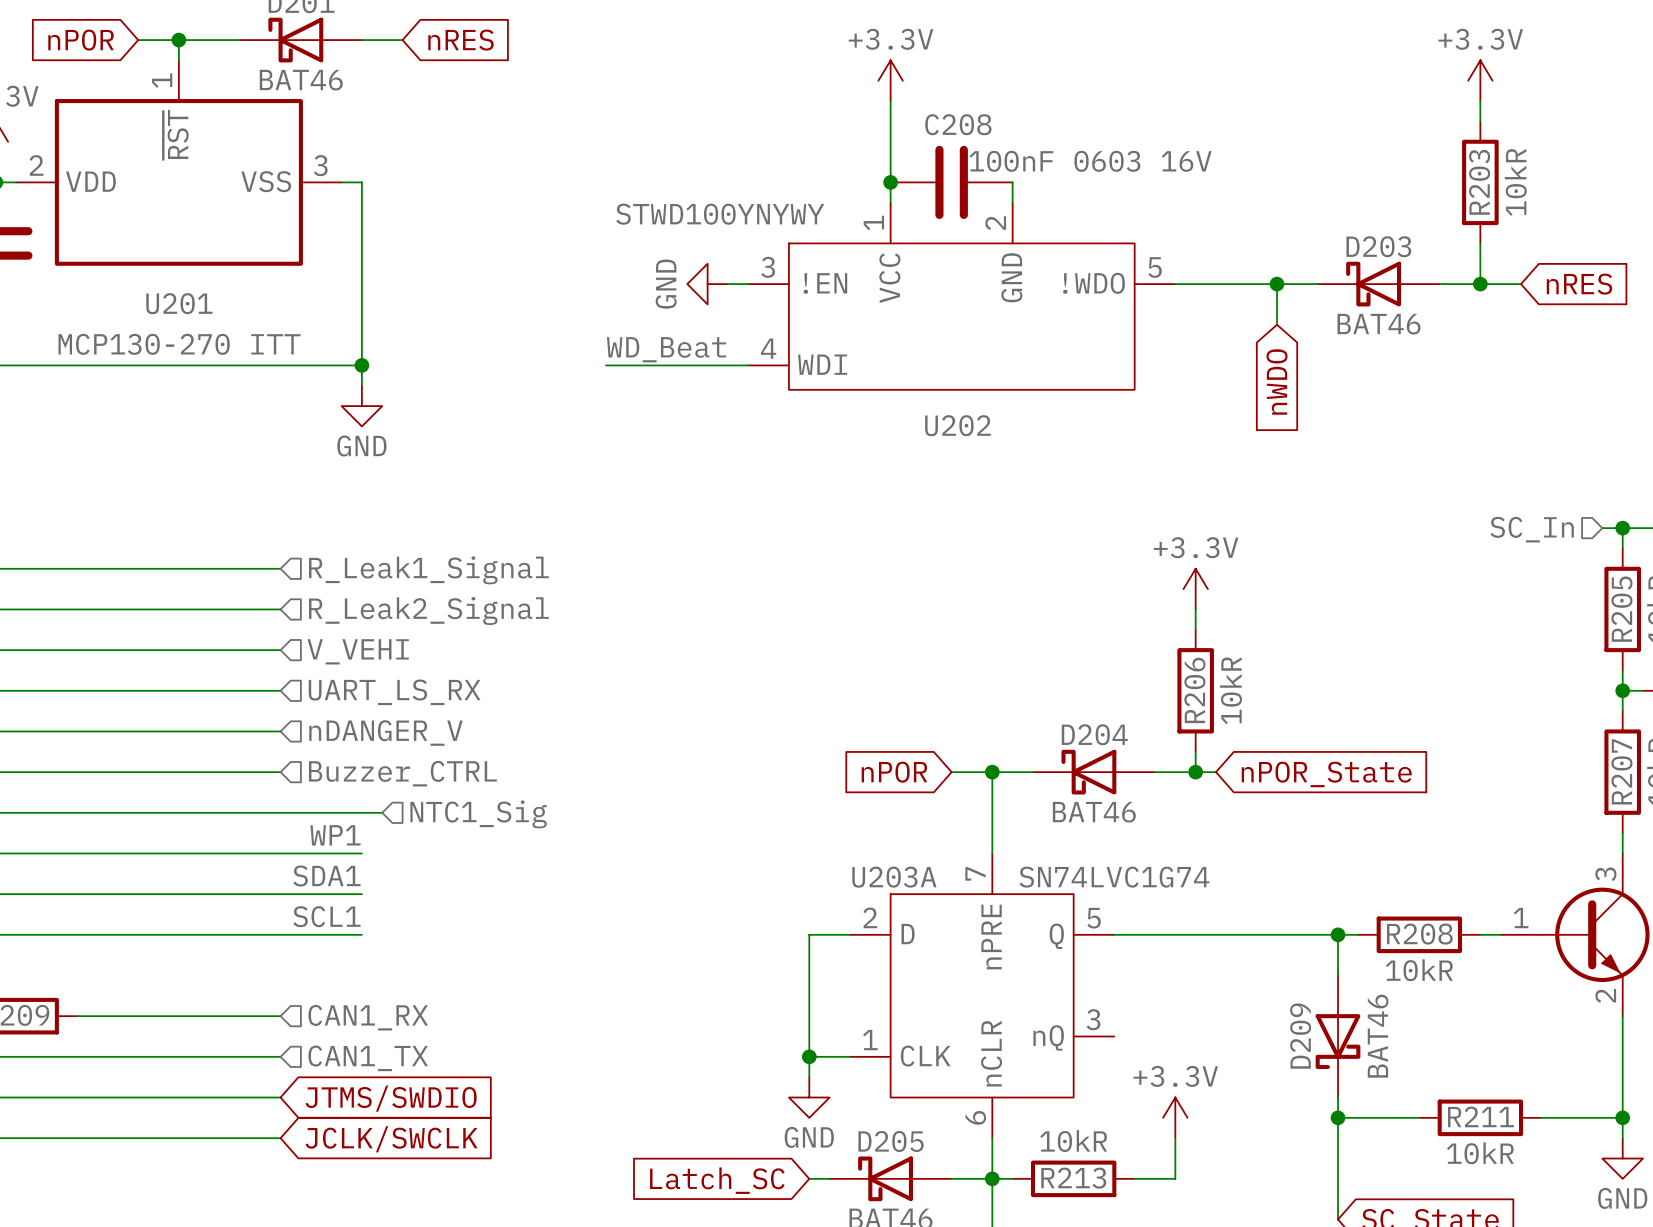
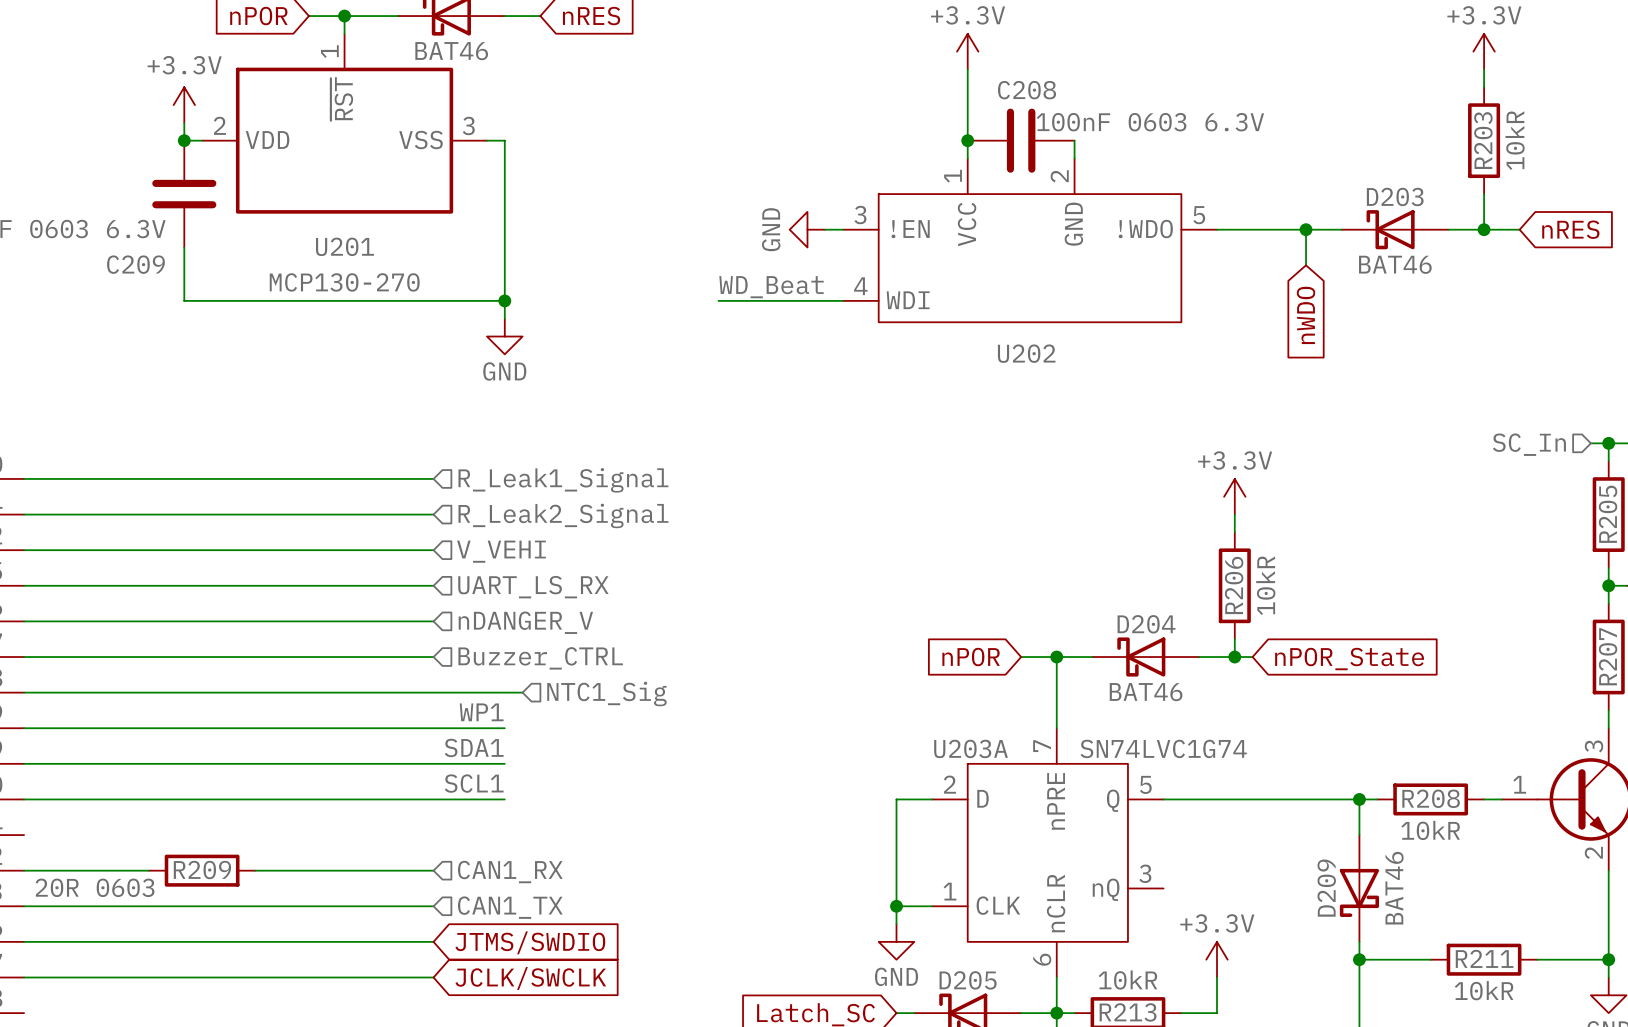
C208 value: 100nF 0603 16V (1090, 161) -> 100nF 0603 6.3V (1150, 122)
U202 value: STWD100YNYWY (720, 214) -> none
U201 value: MCP130-270 ITT (179, 344) -> MCP130-270 (344, 282)

